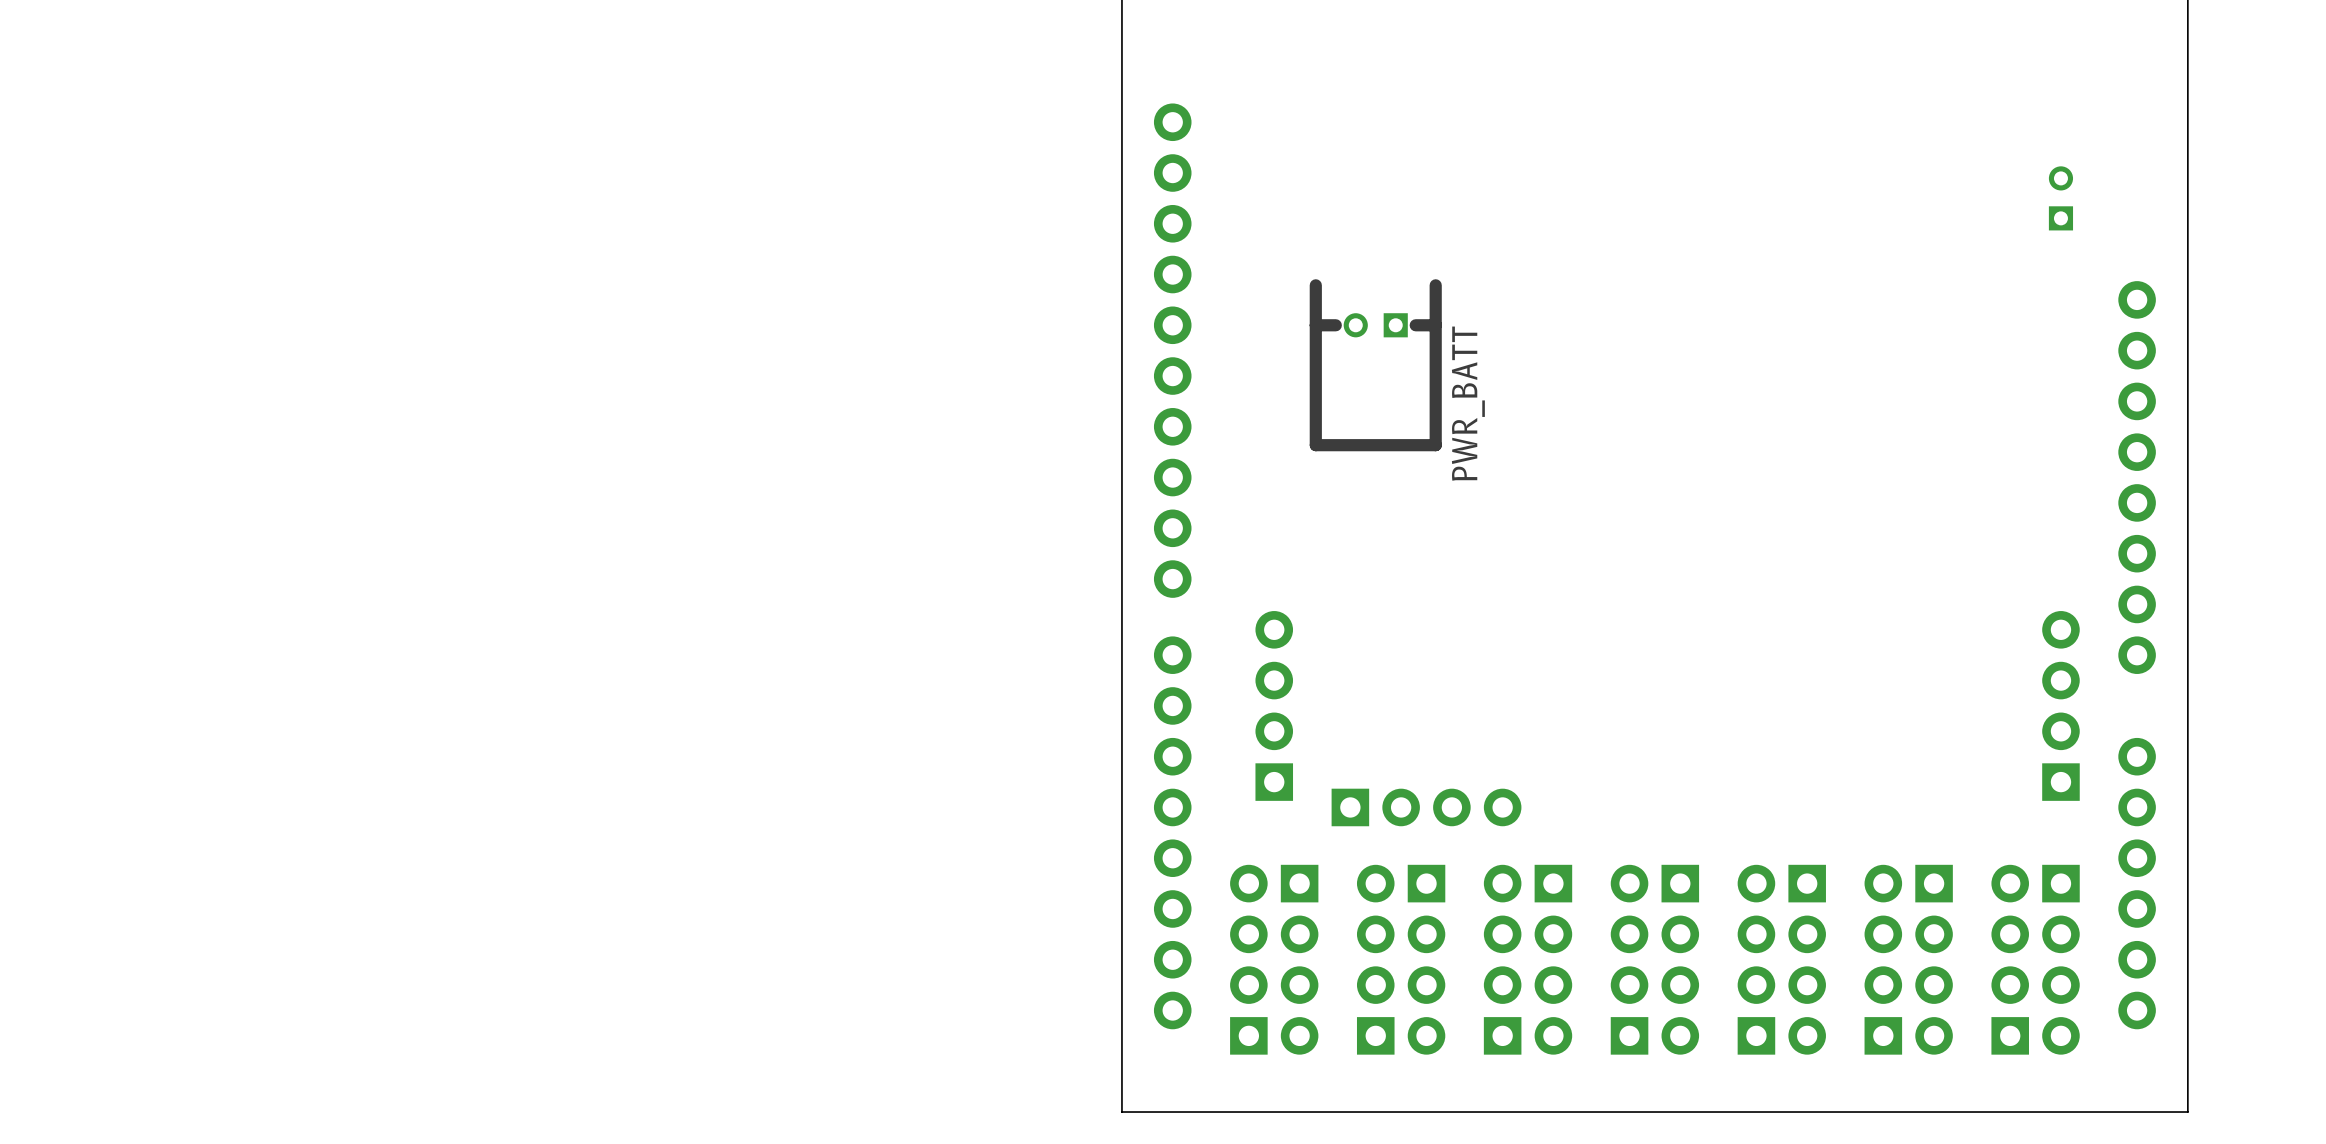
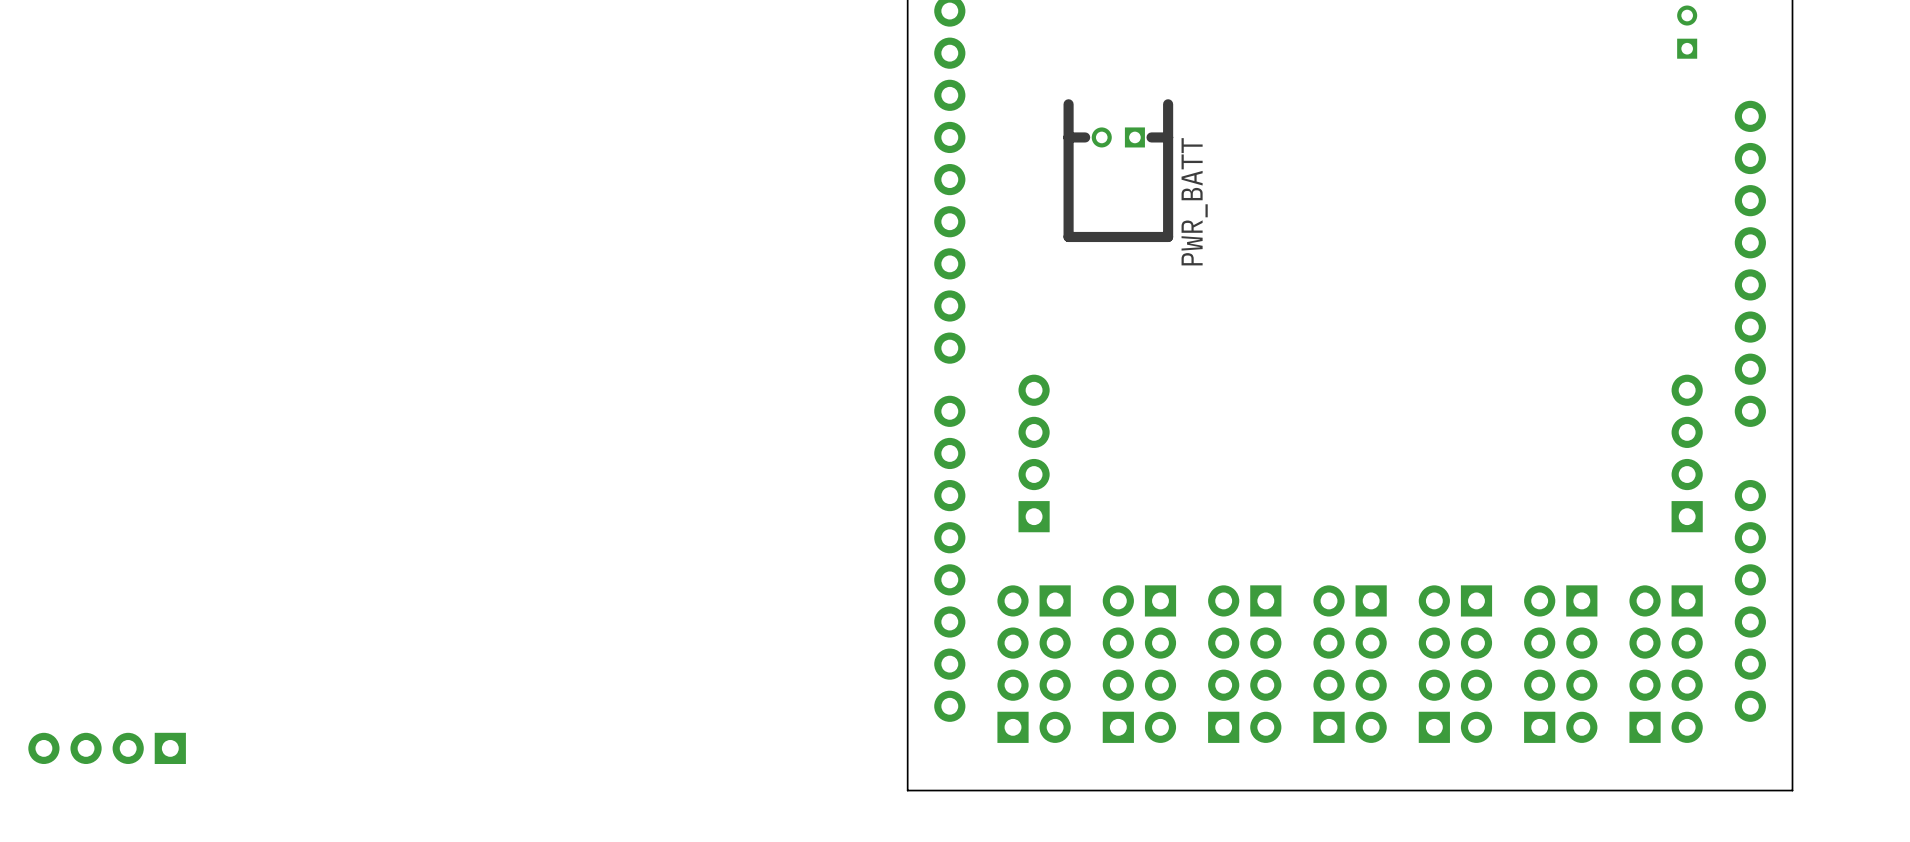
part: (1426, 807) -> none
part: none -> (107, 748)

